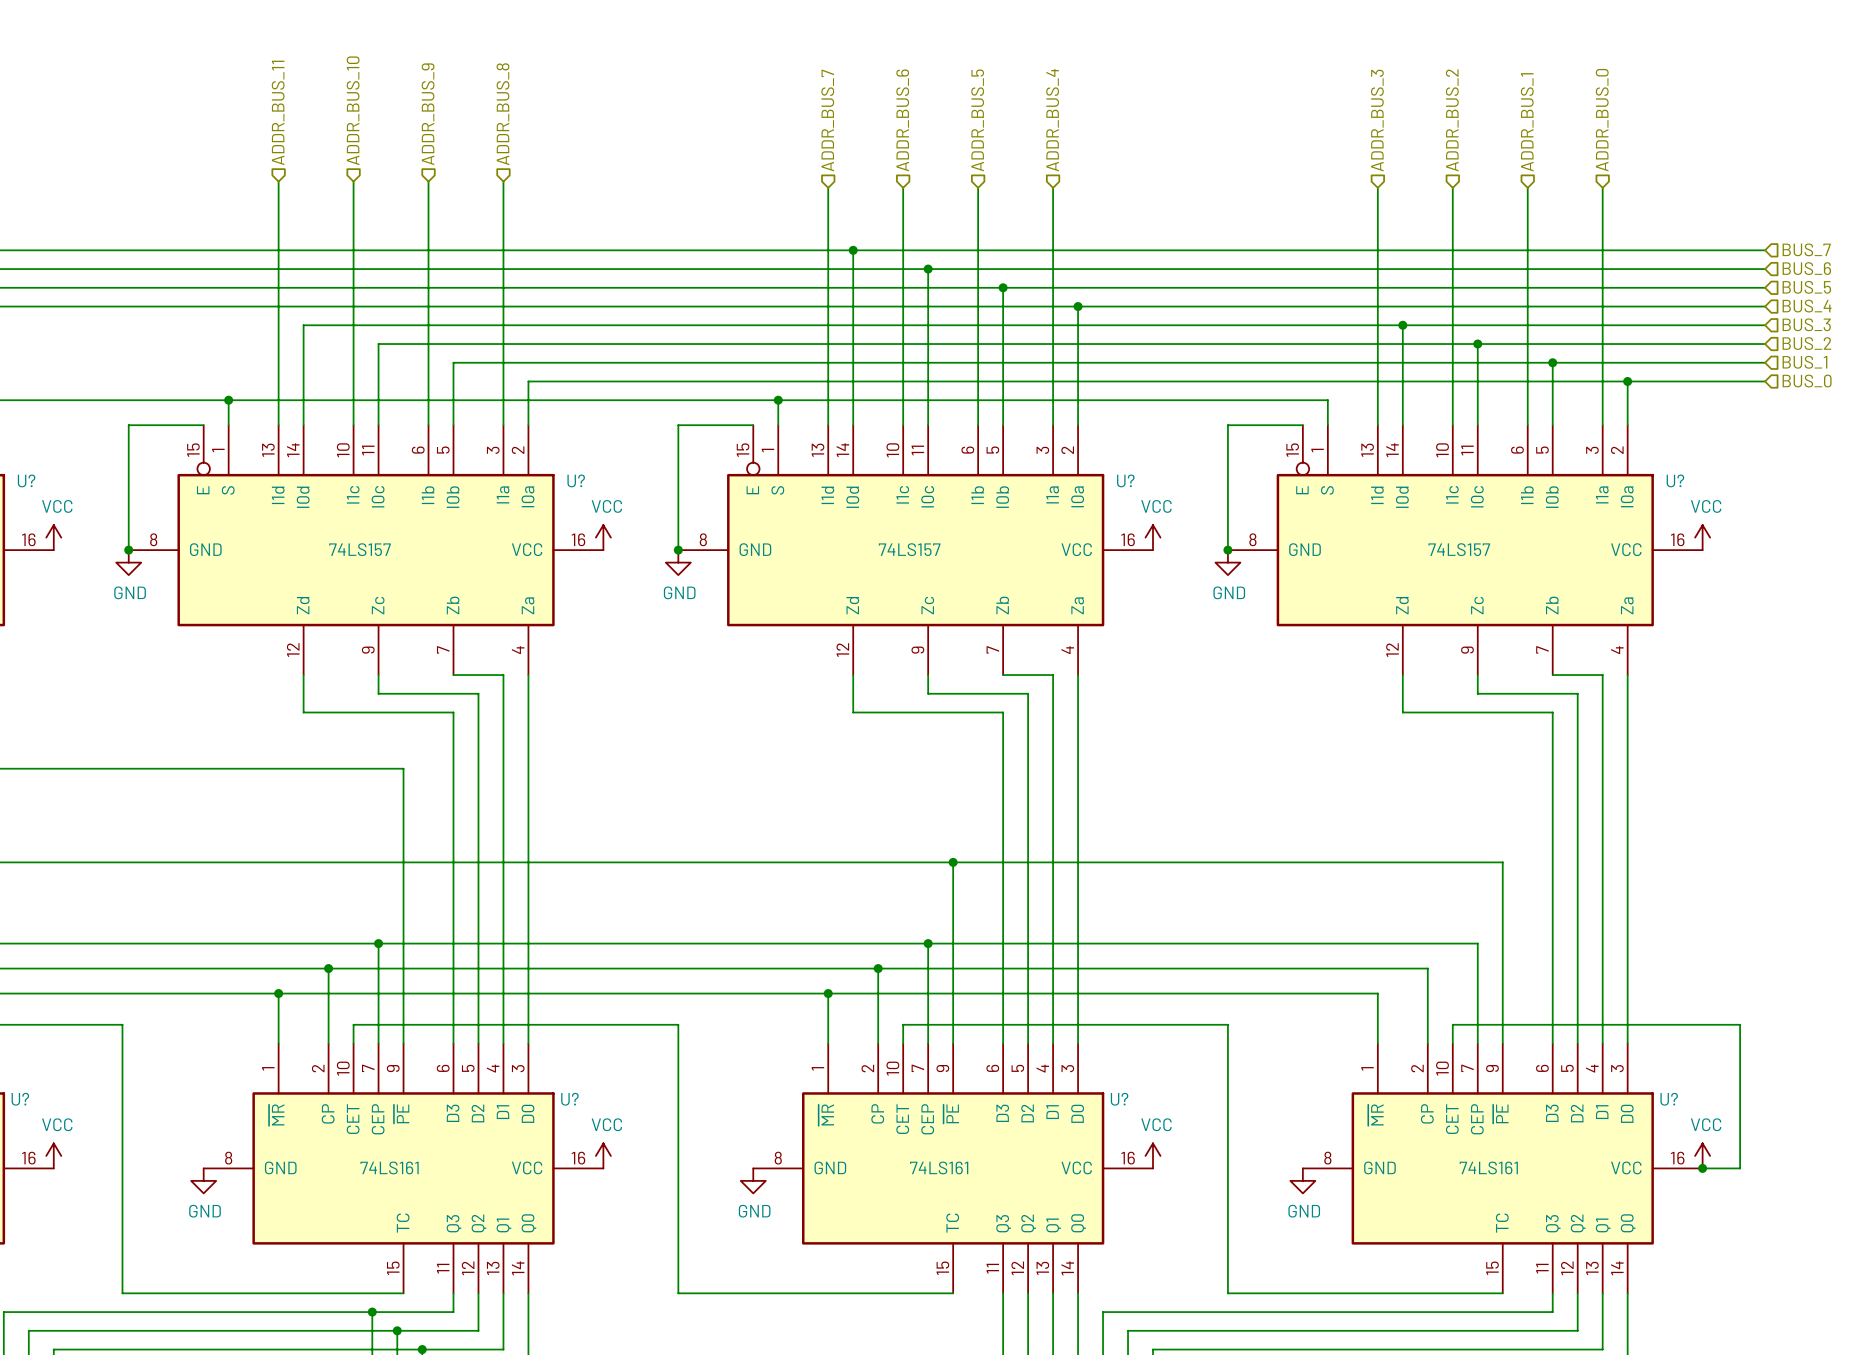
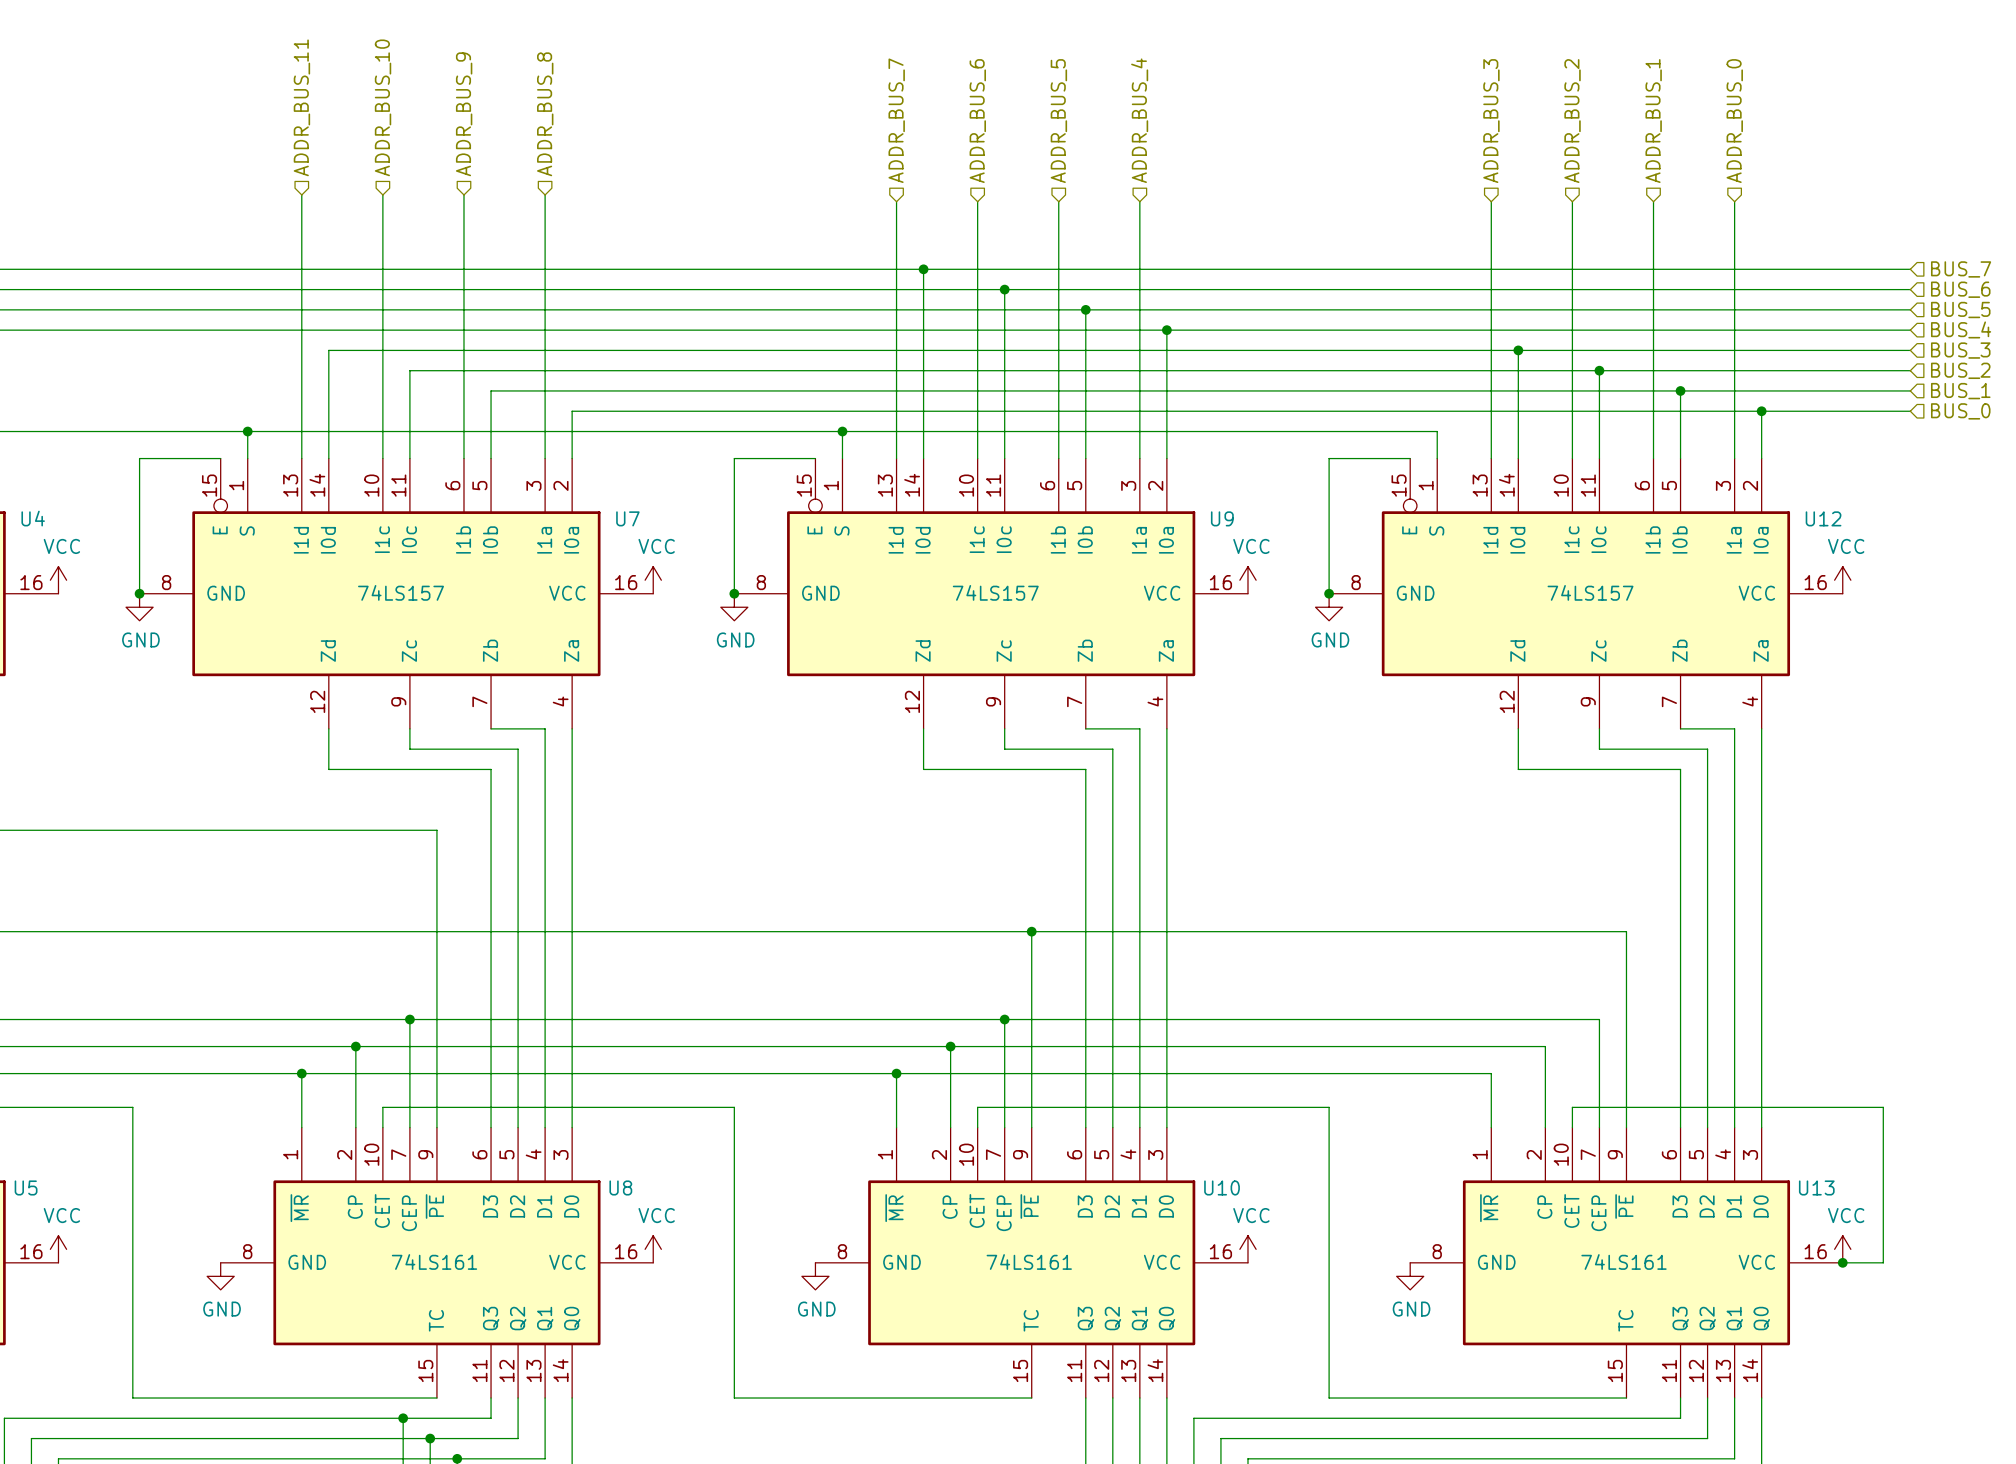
U? name: U? (26, 480) -> U4 (33, 518)
U? name: U? (576, 480) -> U7 (627, 518)
U? name: U? (1125, 480) -> U9 (1222, 518)
U? name: U? (1675, 480) -> U12 (1823, 518)
U? name: U? (20, 1099) -> U5 (26, 1187)
U? name: U? (569, 1099) -> U8 (620, 1187)
U? name: U? (1119, 1099) -> U10 (1222, 1187)
U? name: U? (1669, 1099) -> U13 (1816, 1187)

